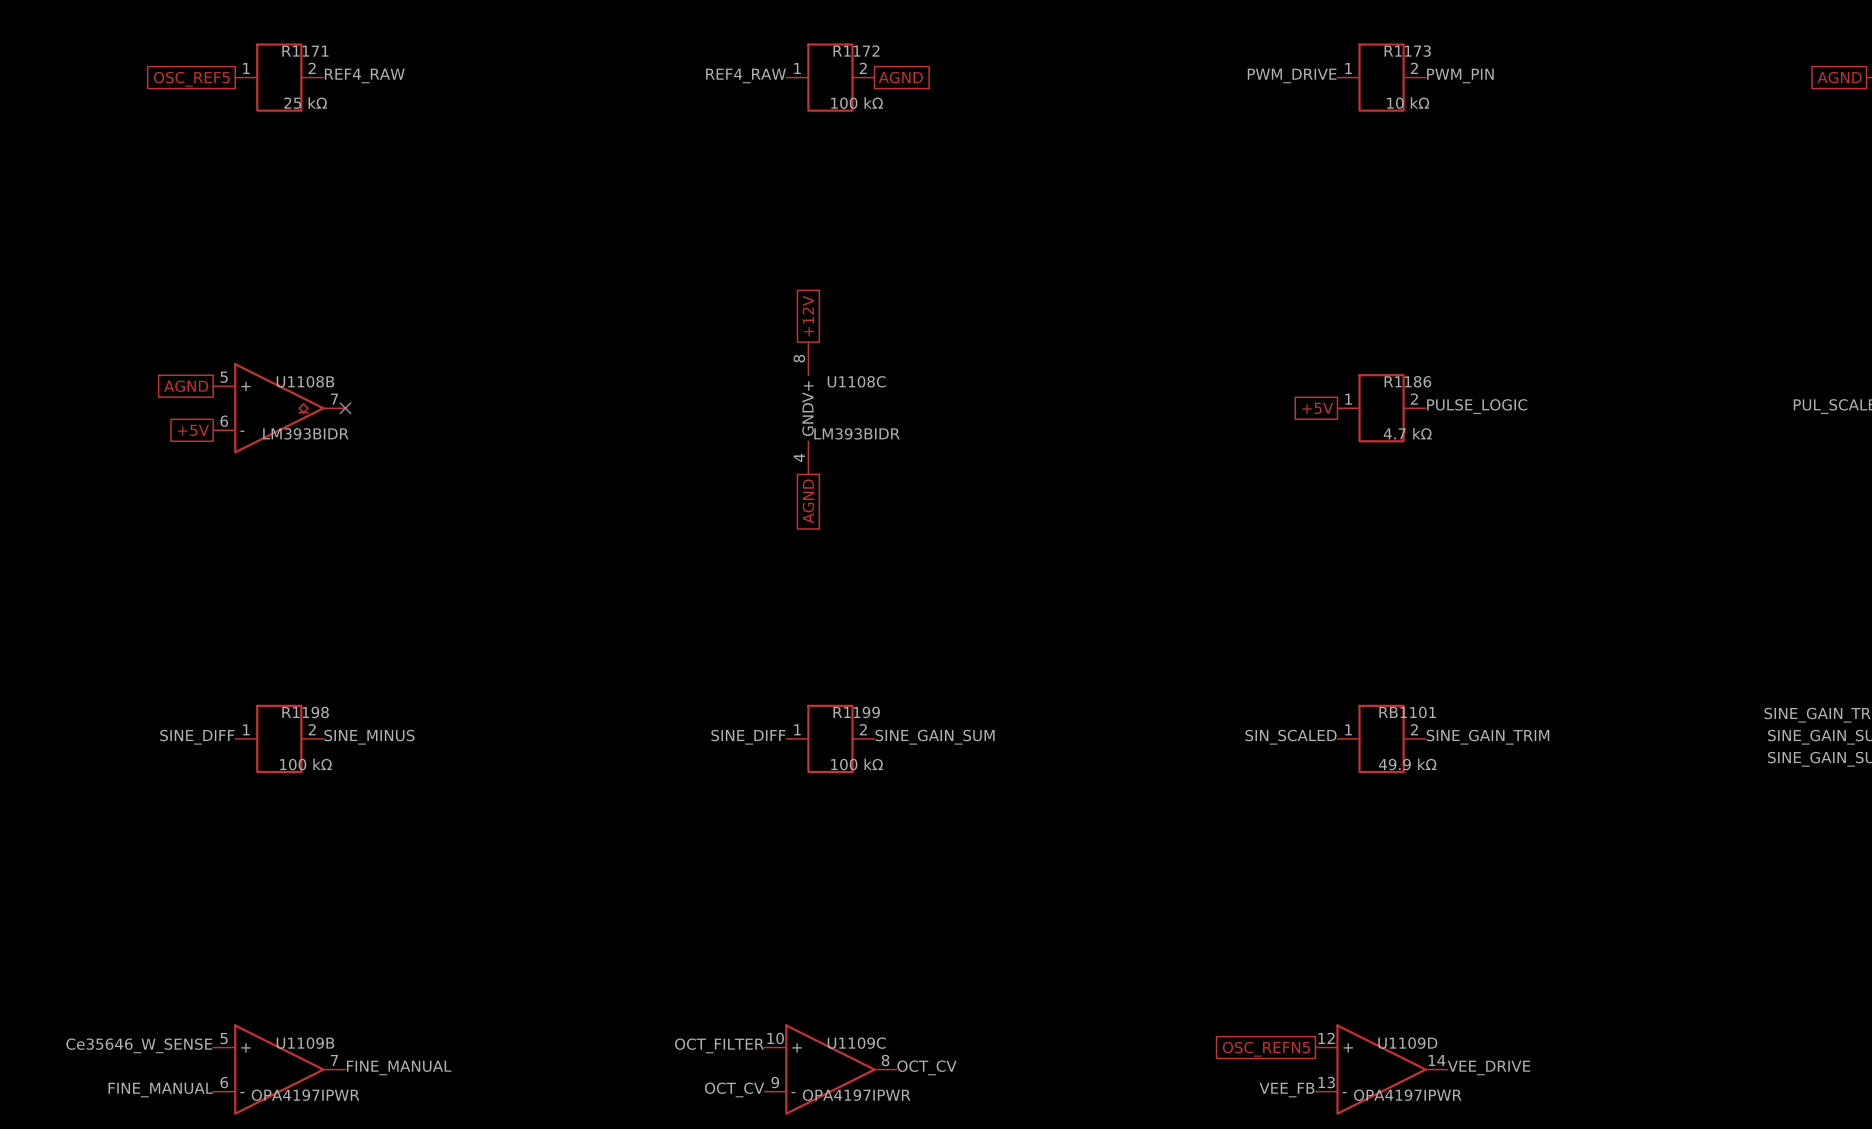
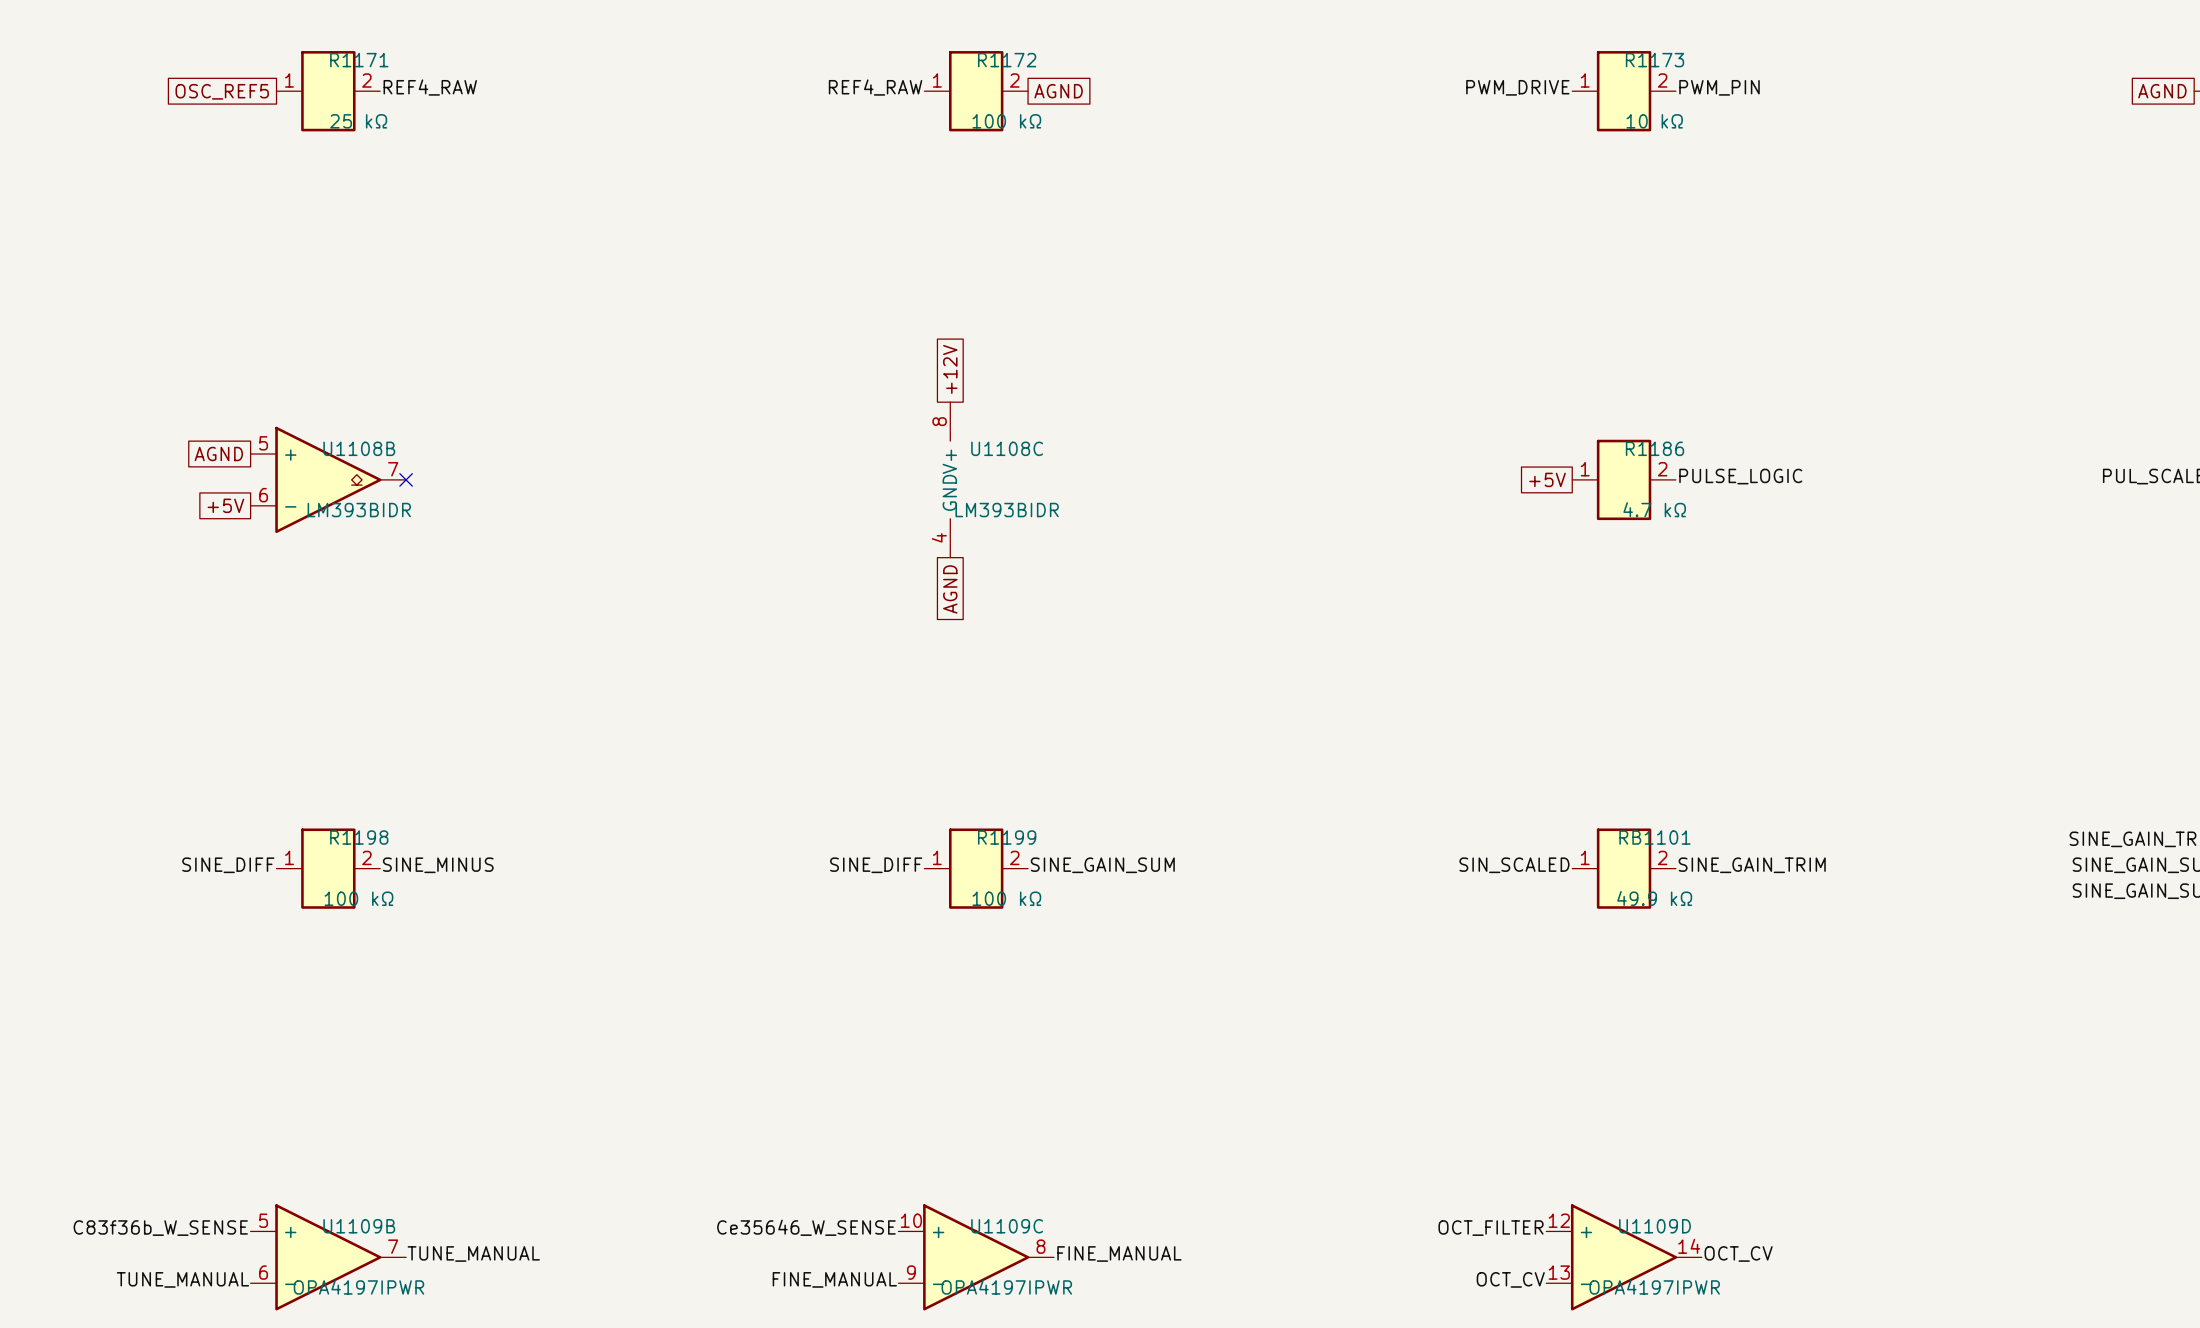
label: Ce35646_W_SENSE (139, 1045) -> C83f36b_W_SENSE (160, 1228)
label: OCT_FILTER (719, 1045) -> Ce35646_W_SENSE (806, 1227)
label: none -> OCT_FILTER (1491, 1228)
global label: OSC_REFN5 (1266, 1049) -> none
label: FINE_MANUAL (399, 1067) -> TUNE_MANUAL (473, 1253)
label: OCT_CV (927, 1067) -> FINE_MANUAL (1119, 1253)
label: VEE_DRIVE (1489, 1067) -> OCT_CV (1738, 1253)
label: OCT_CV (734, 1089) -> FINE_MANUAL (834, 1279)
label: FINE_MANUAL (160, 1090) -> TUNE_MANUAL (182, 1279)
label: VEE_FB (1286, 1090) -> OCT_CV (1510, 1279)

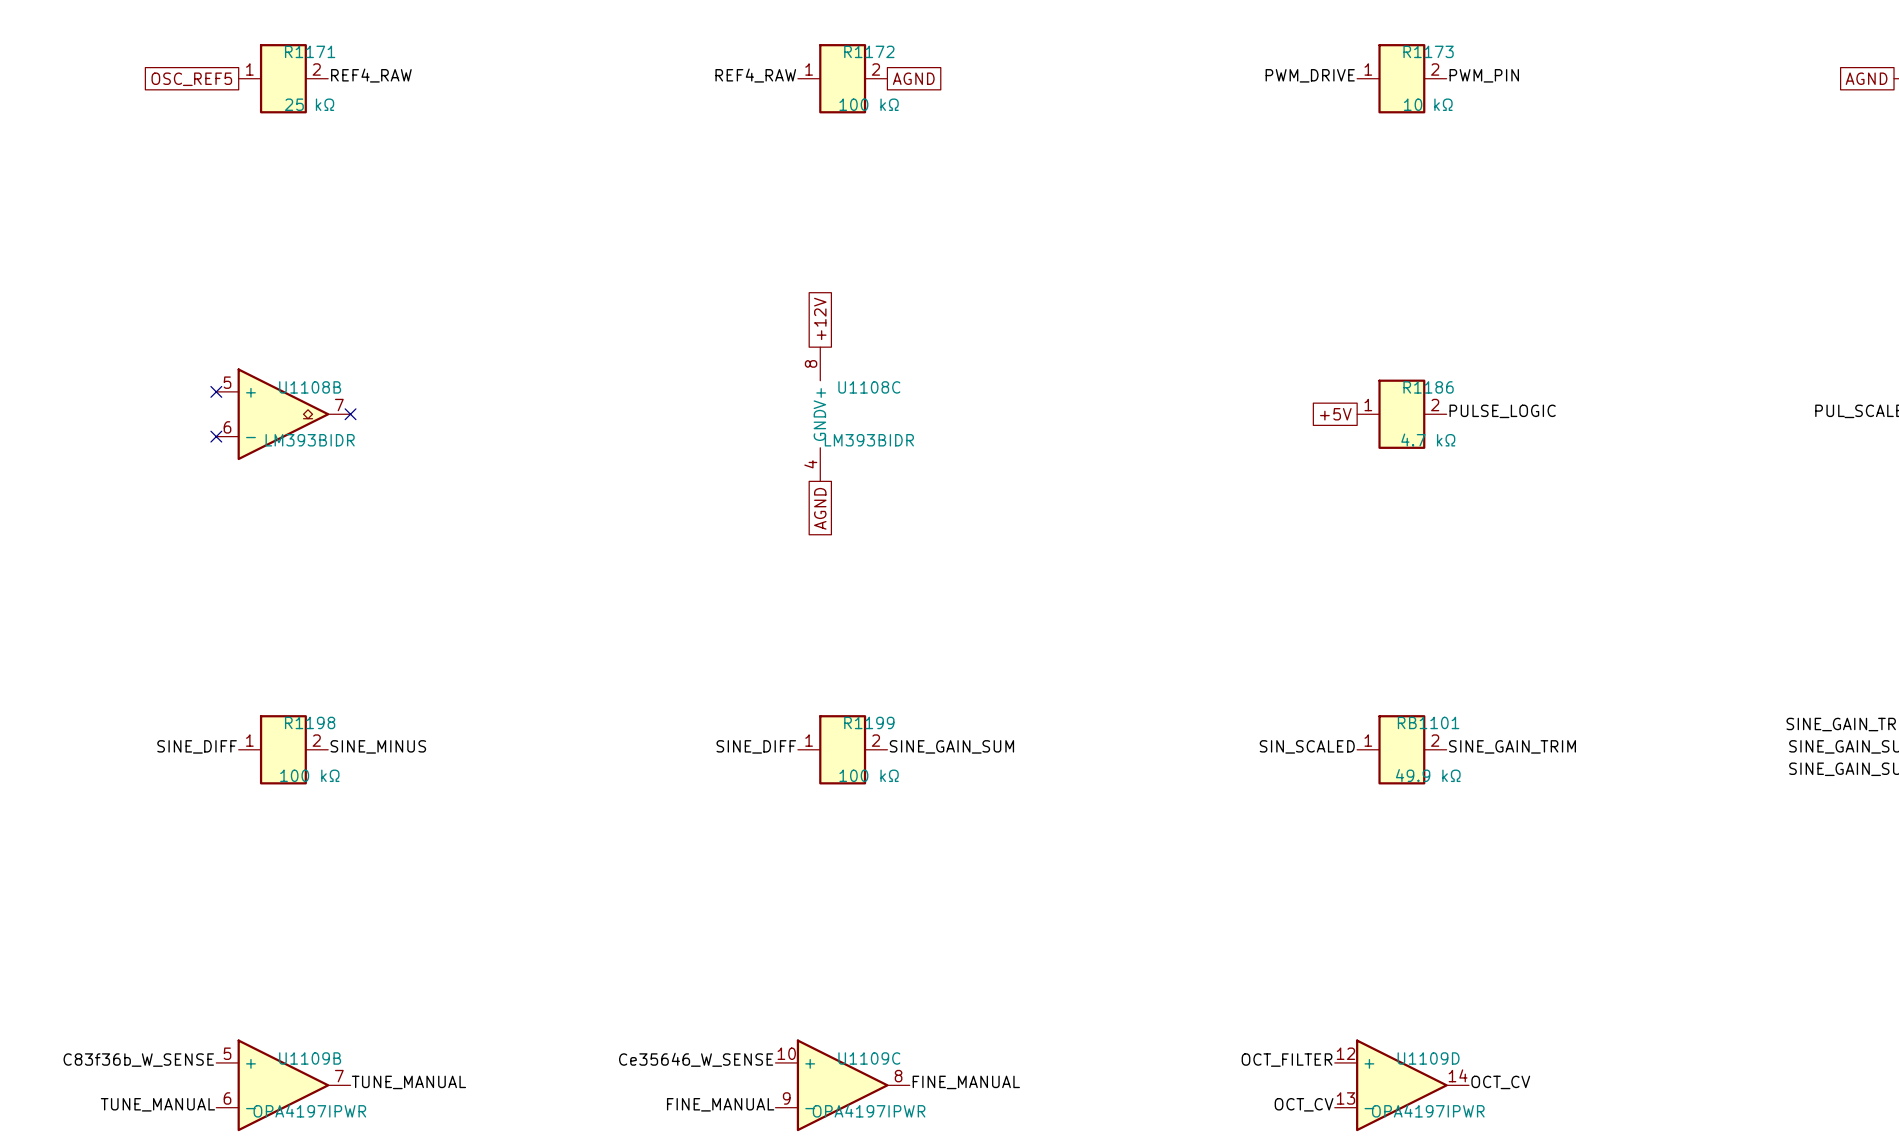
global label: AGND (218, 454) -> none
no-connect mark: none -> (216, 391)
global label: +5V (225, 505) -> none
no-connect mark: none -> (216, 436)

